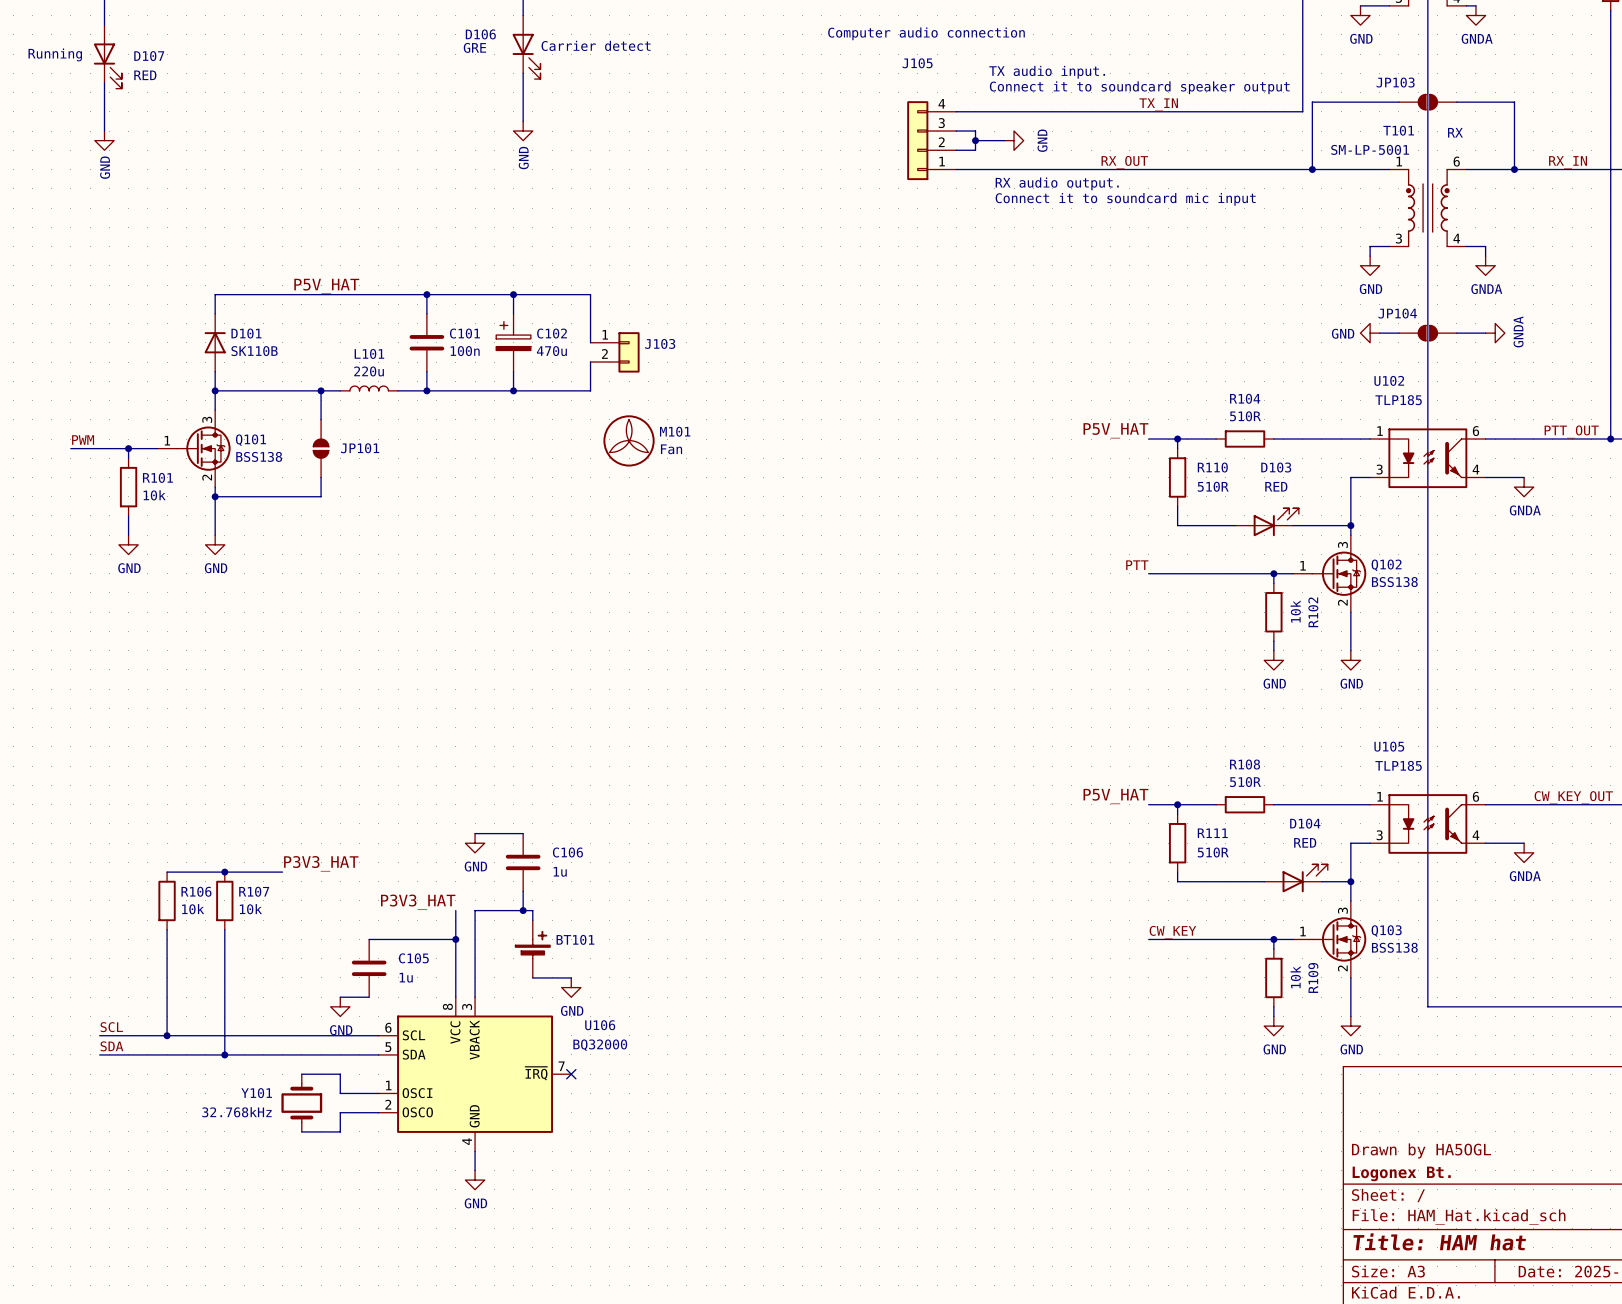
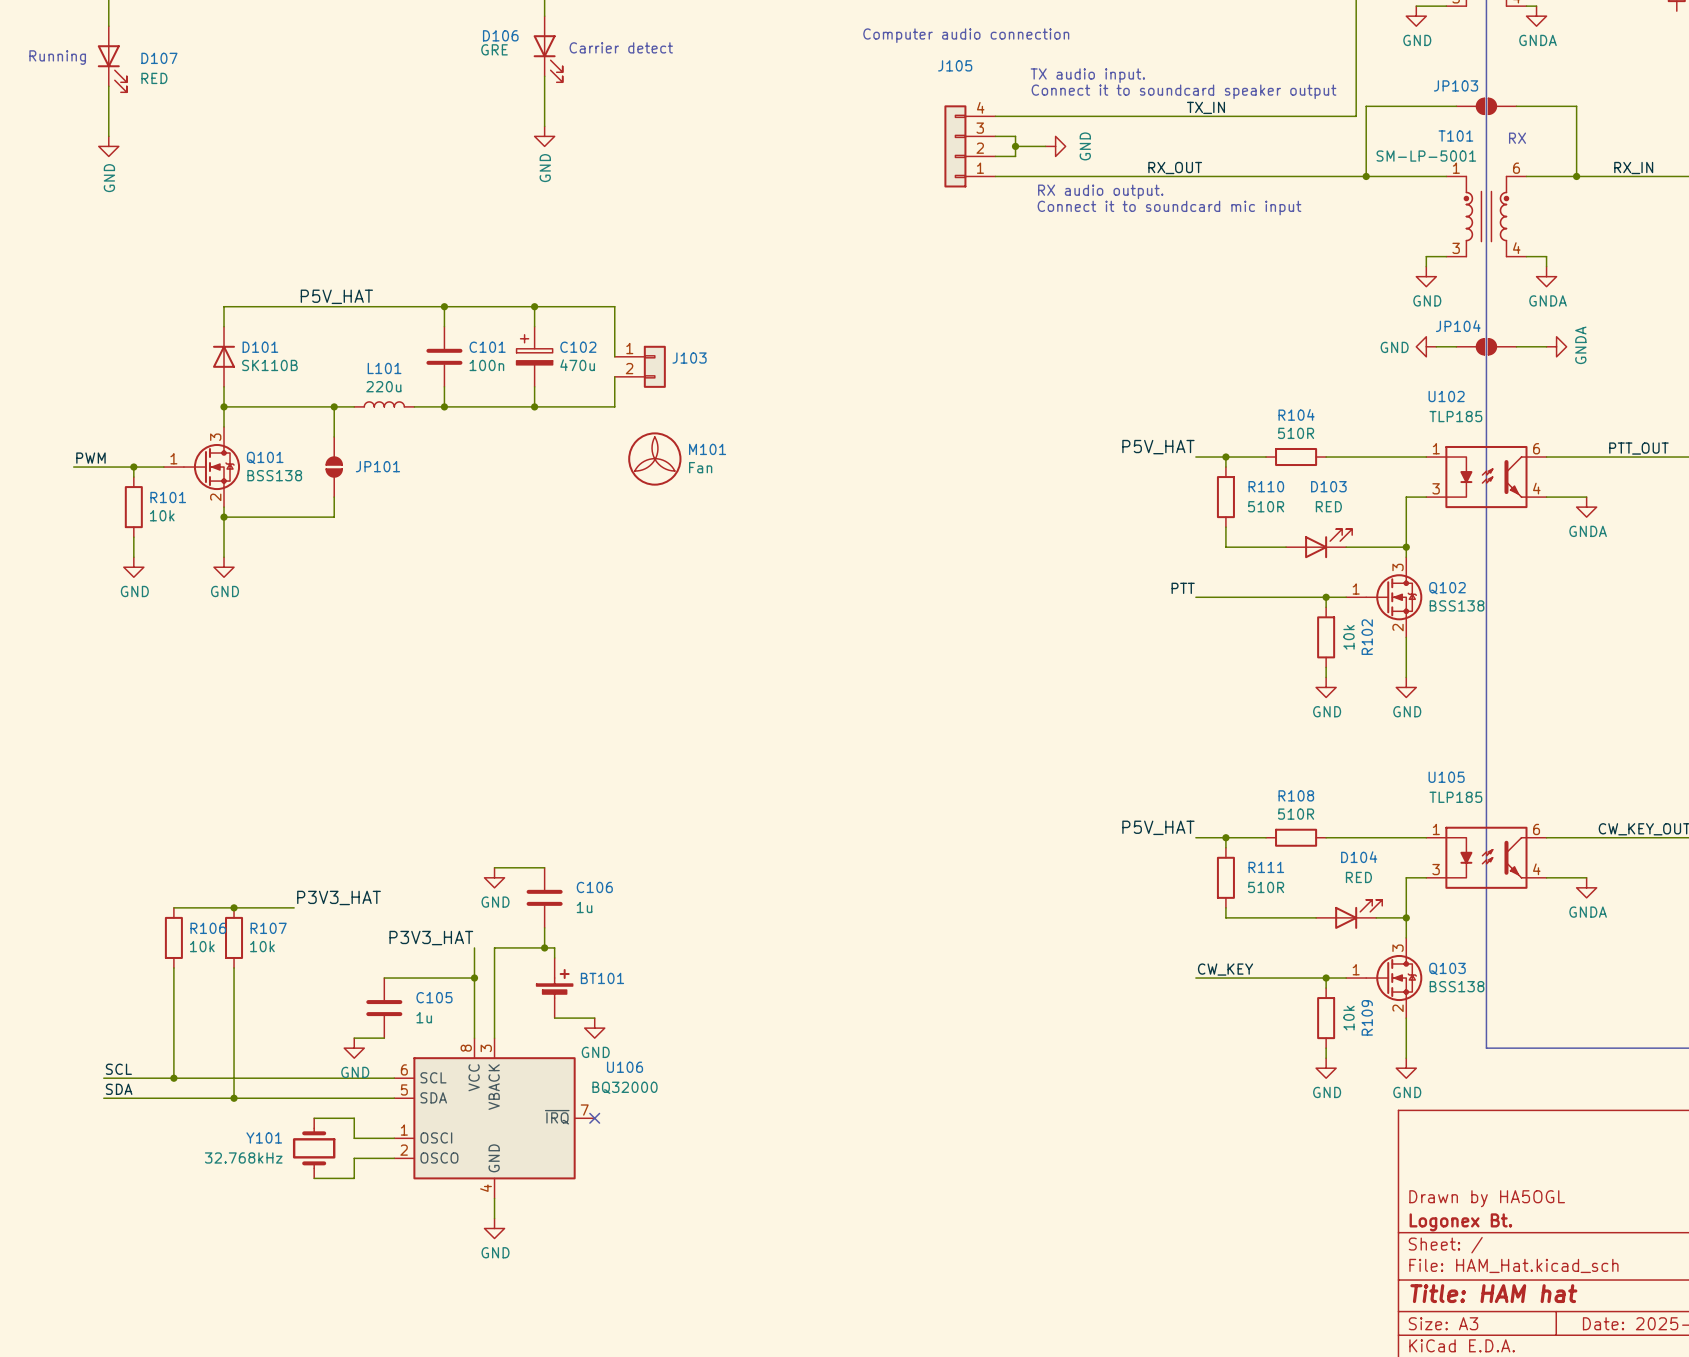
wire: (1610, 10) (1610, 439) -> none
junction: (1610, 439) -> none

